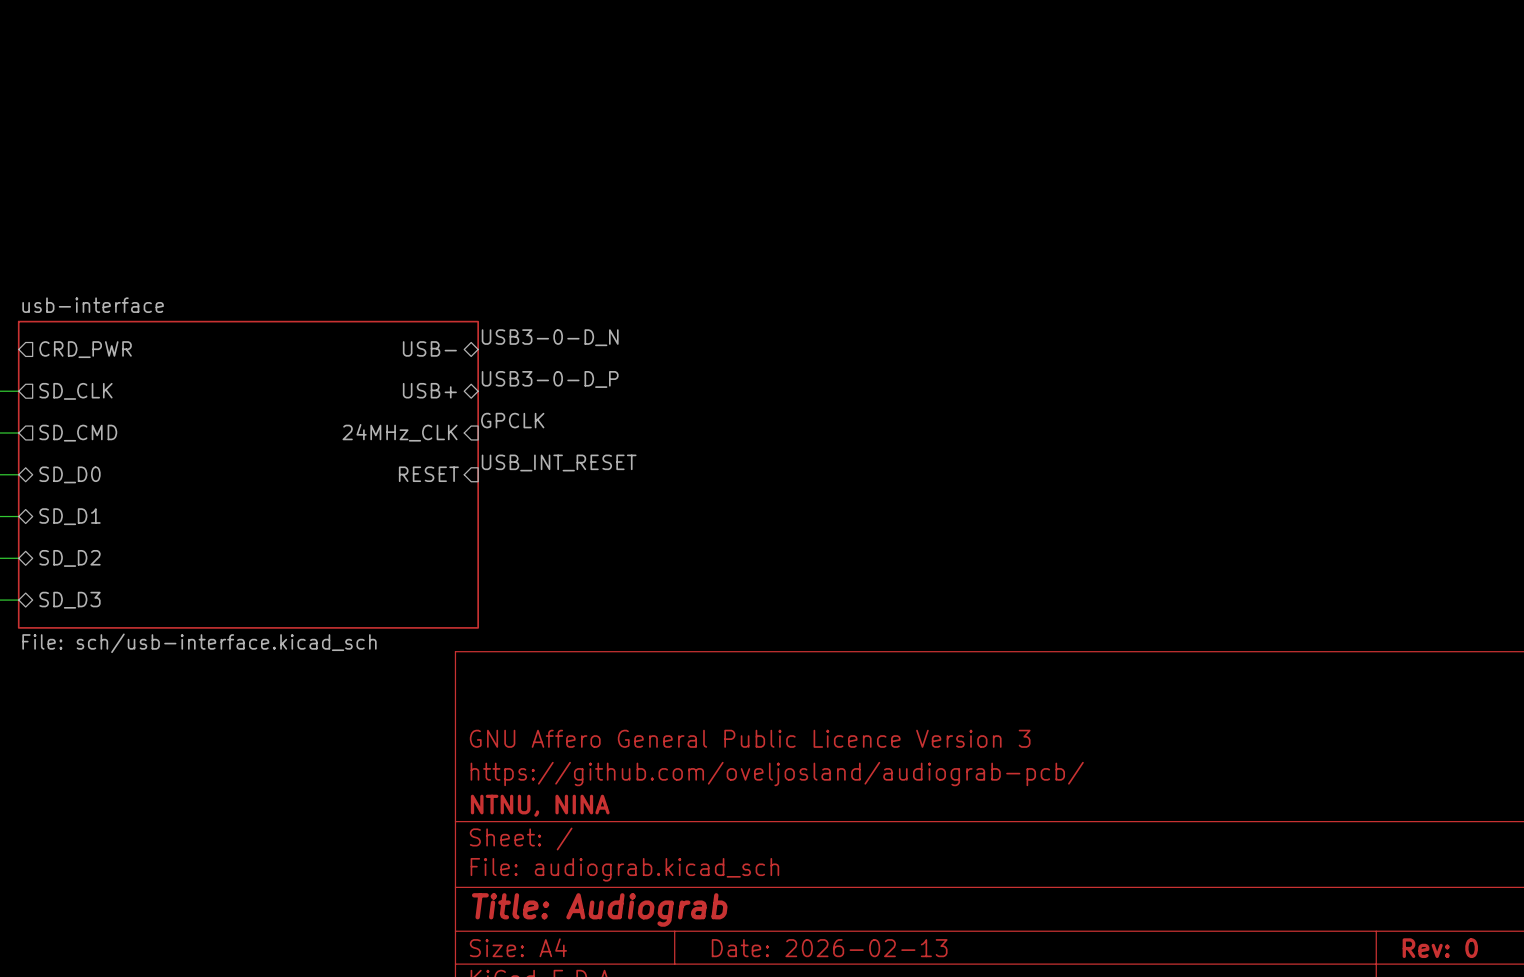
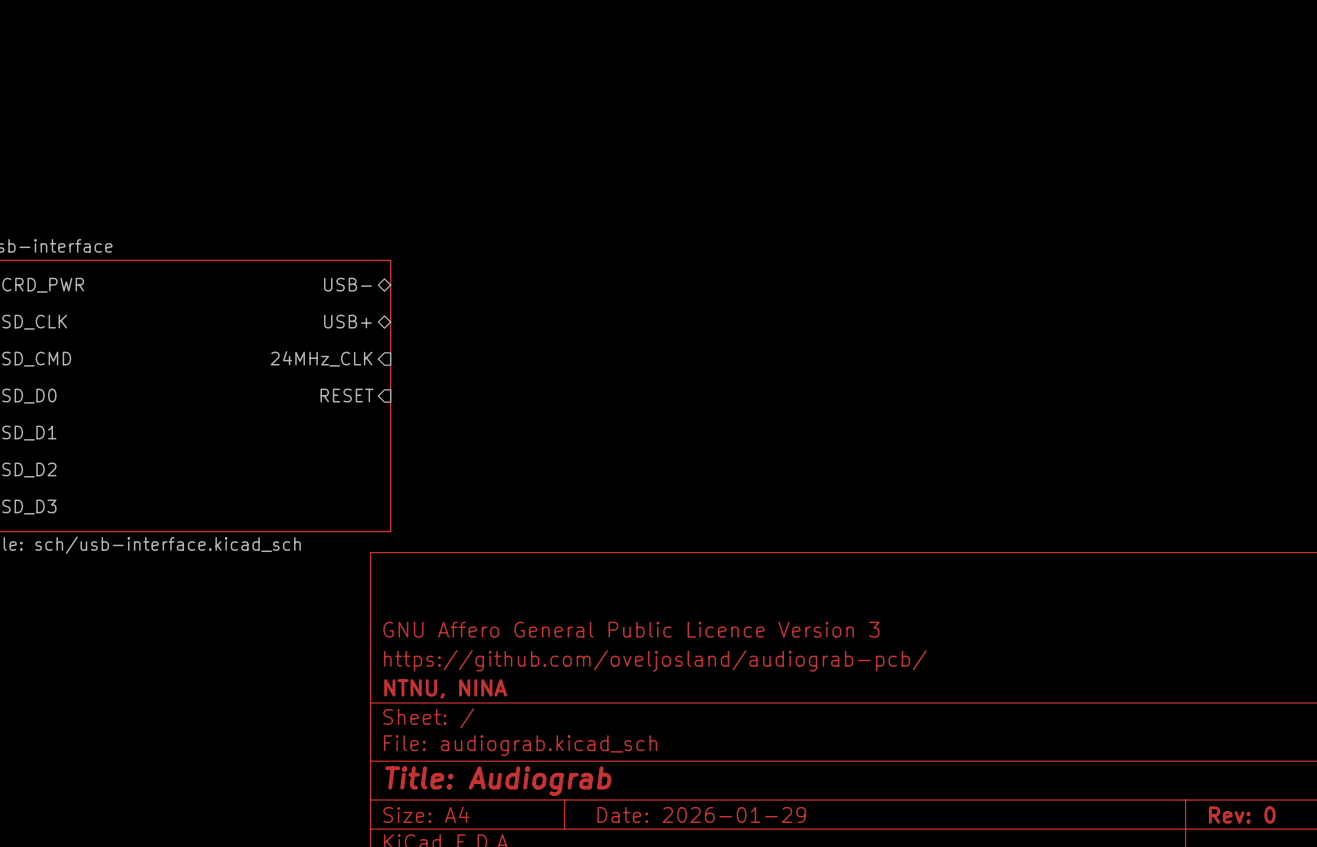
label: USB3-0-D_N (550, 337) -> none
label: USB3-0-D_P (550, 379) -> none
label: GPCLK (512, 420) -> none
label: USB_INT_RESET (559, 463) -> none
title block: Date: 2026-02-13 (829, 948) -> Date: 2026-01-29 (701, 814)

